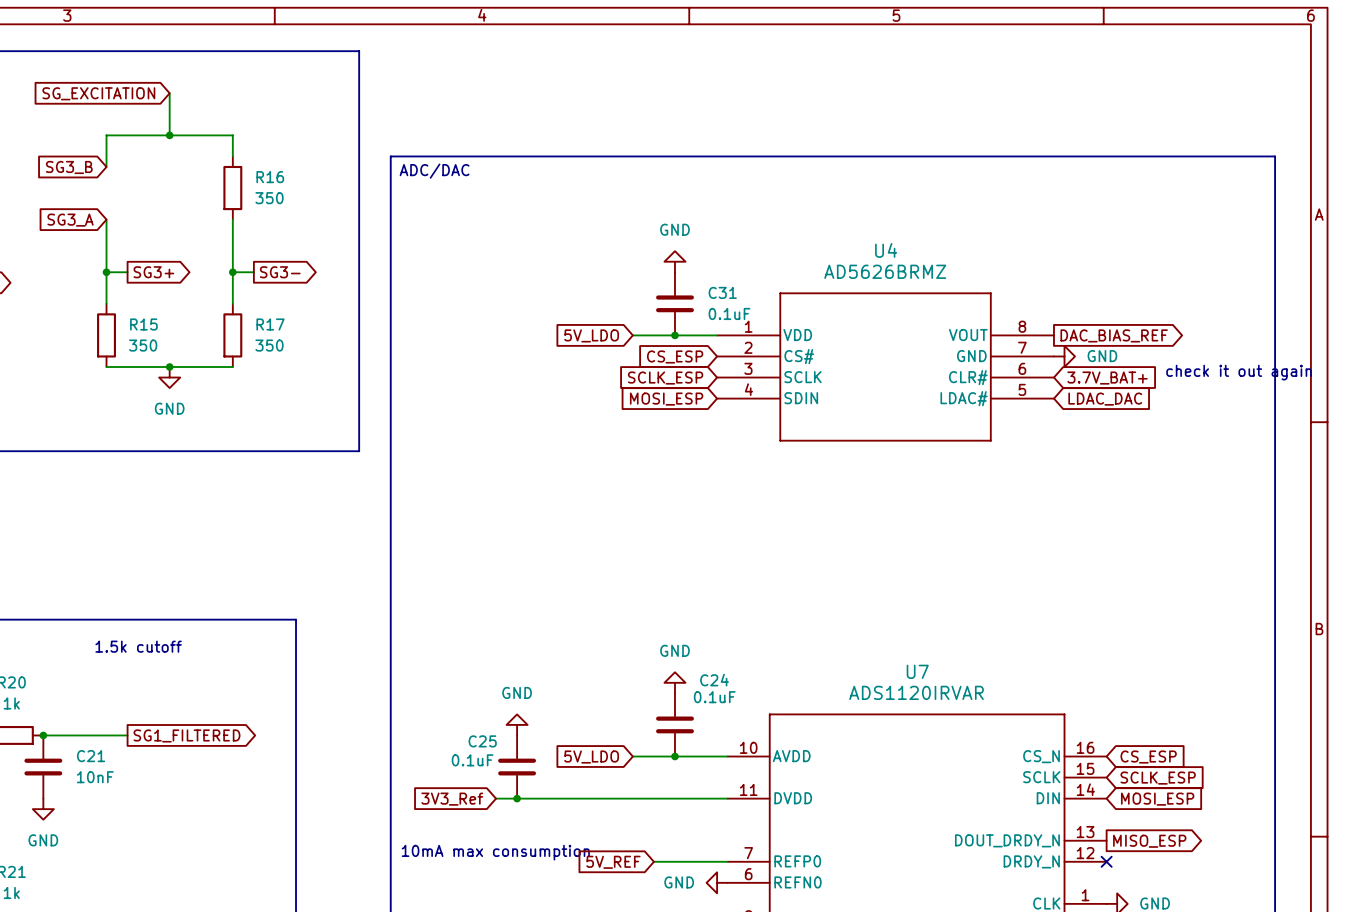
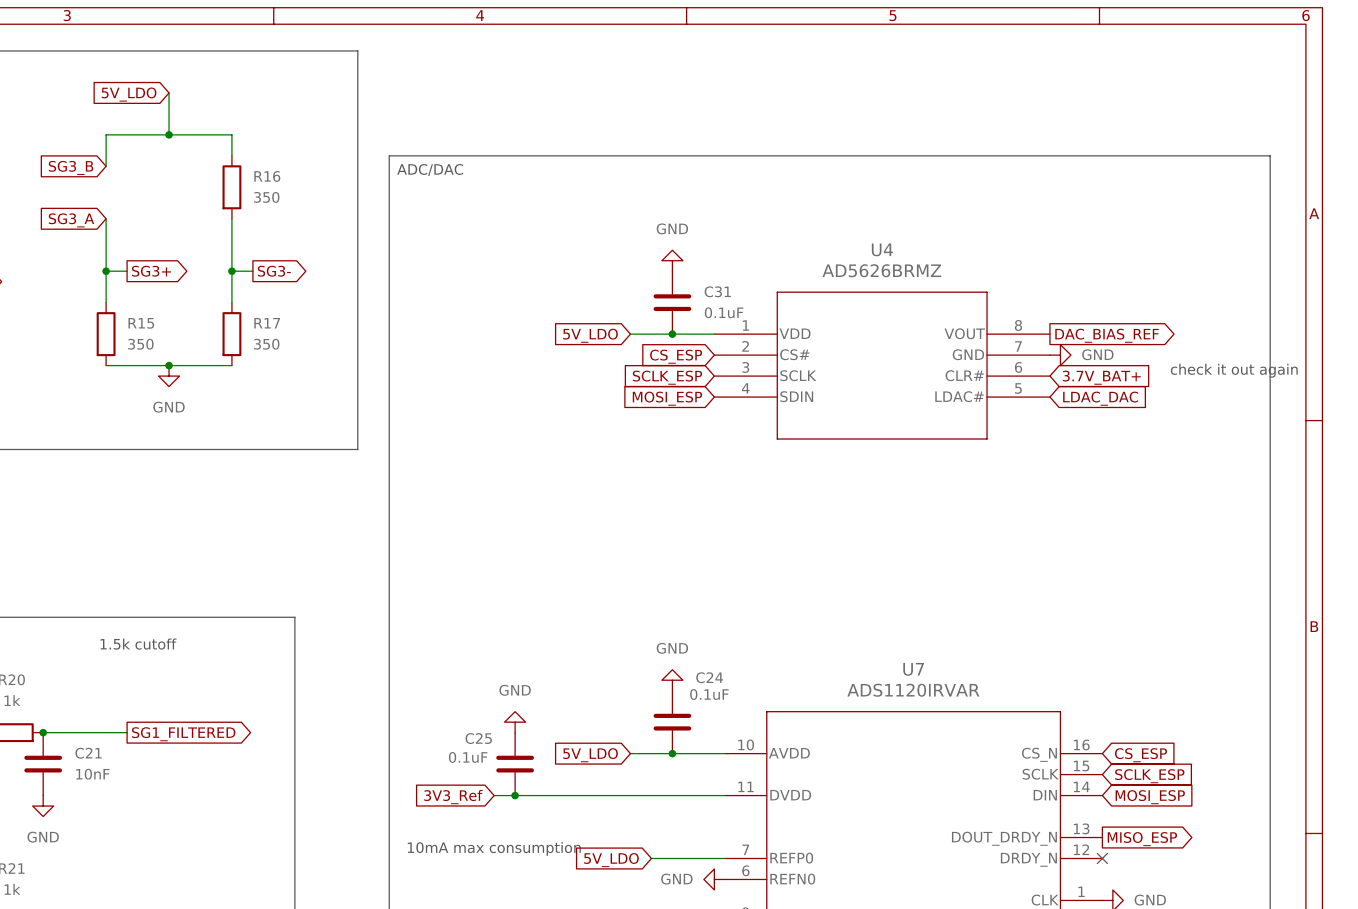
global label: SG_EXCITATION (98, 93) -> 5V_LDO (129, 94)
global label: 5V_REF (613, 862) -> 5V_LDO (611, 860)

